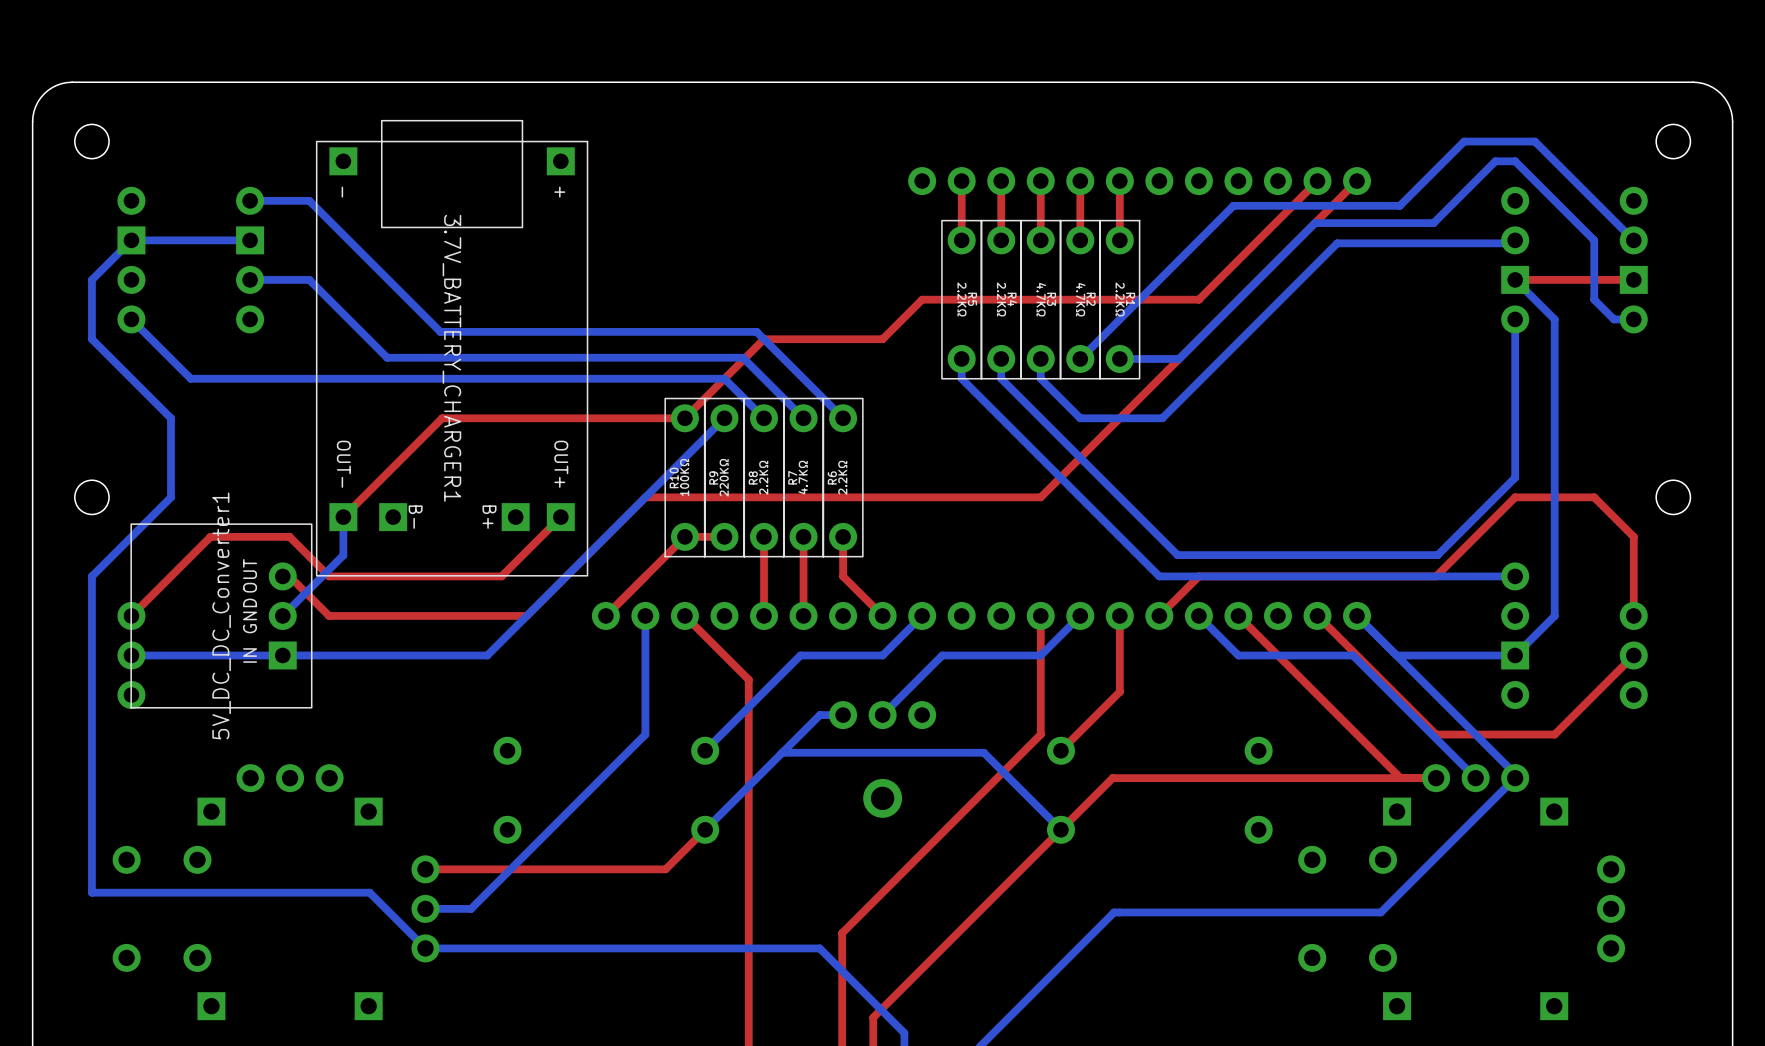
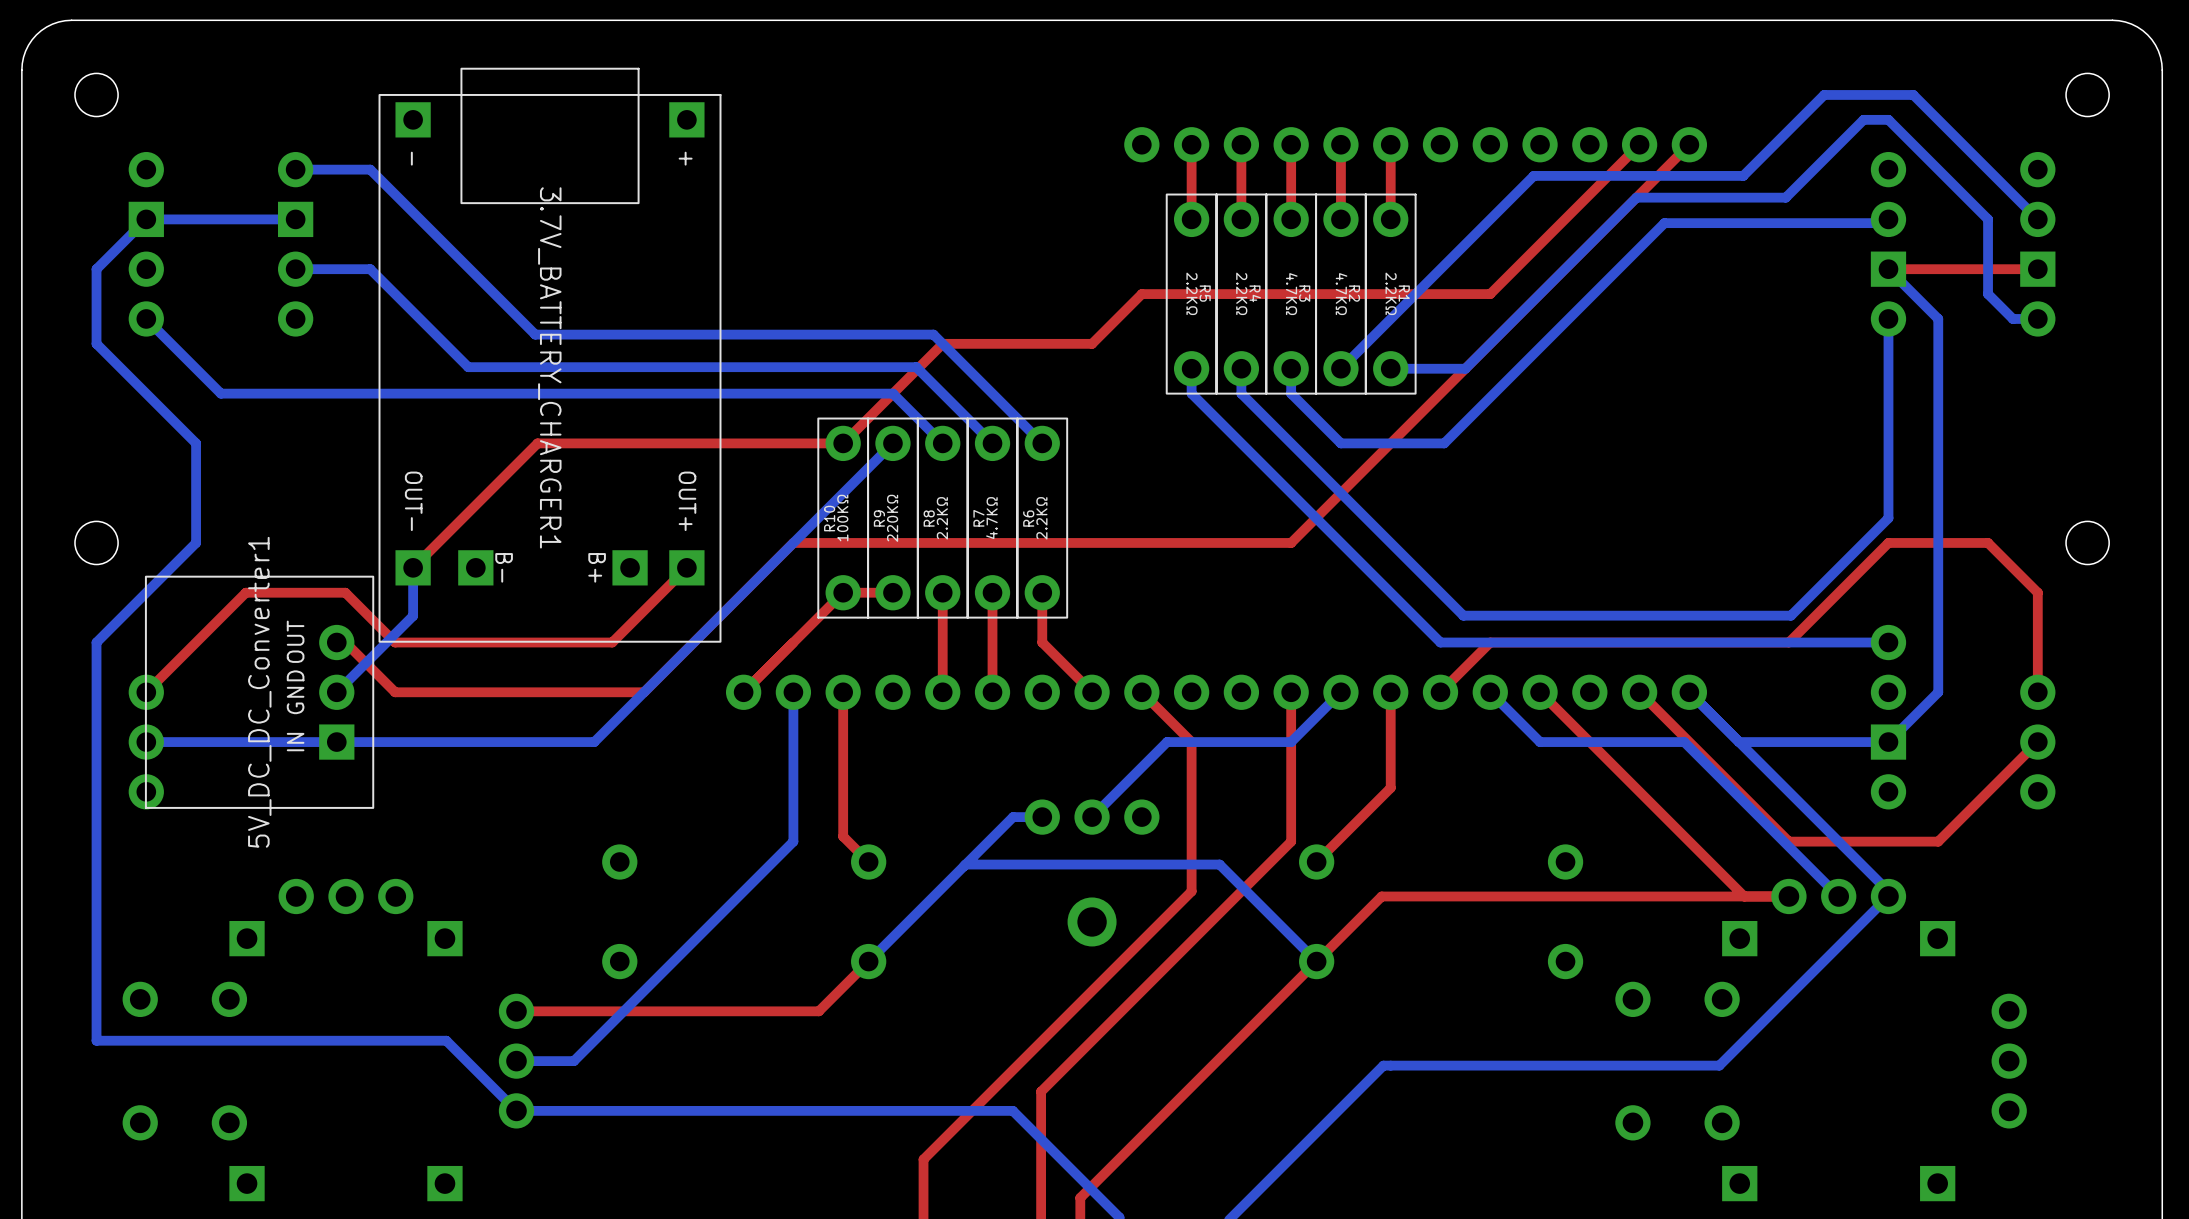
top track: (684, 615) (748, 679) (748, 987) -> (1141, 692) (1191, 742) (1191, 891) (923, 1159)
top track: none -> (843, 692) (843, 836) (868, 862)
bottom track: (922, 615) (882, 655) (800, 655) (705, 750) -> none

